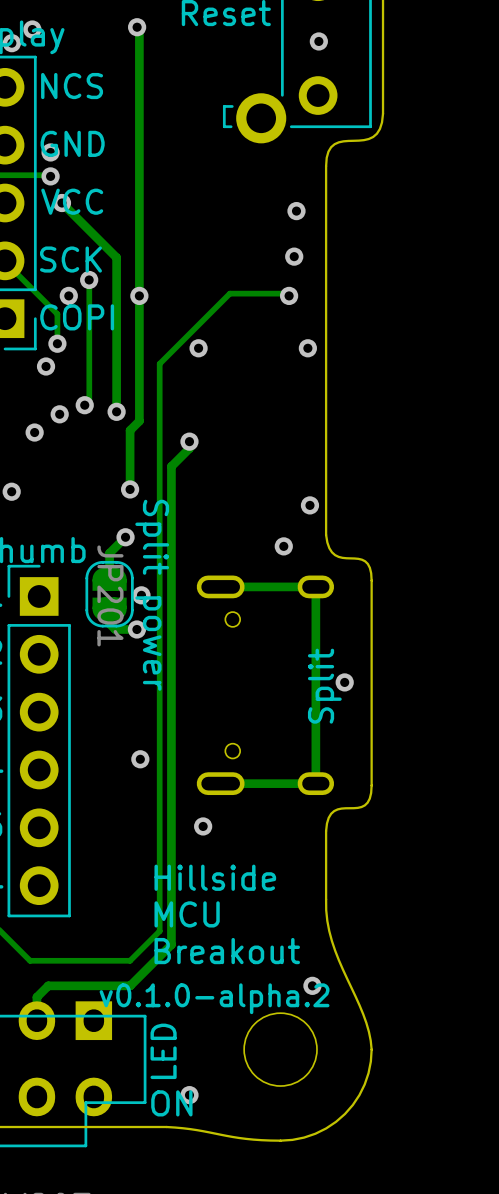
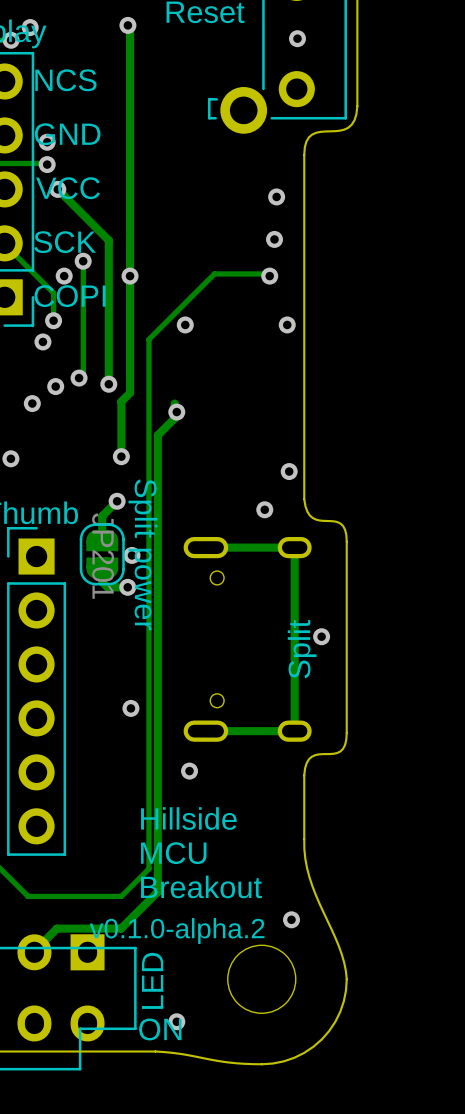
track: none -> (174, 403) (174, 418) (157, 435) (157, 891) (121, 928) (56, 928) (30, 954)
track: (189, 441) (189, 448) (171, 466) (171, 944) (130, 985) (48, 985) (36, 997) (36, 1020) -> none

